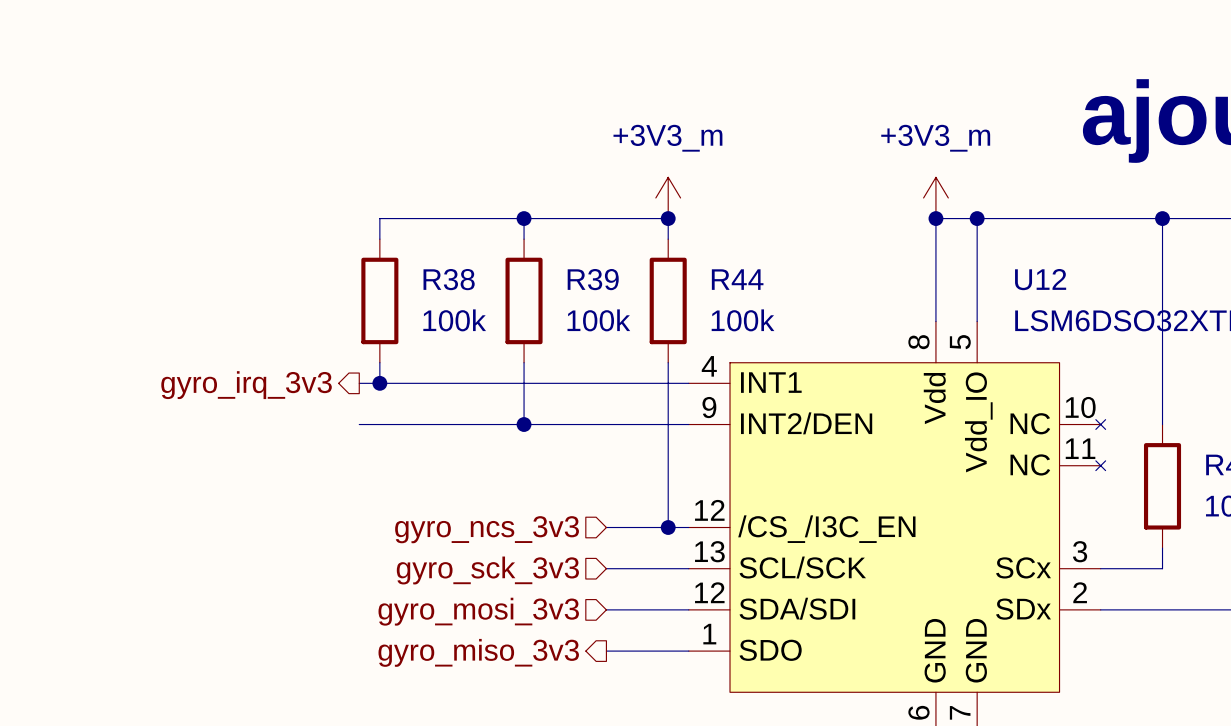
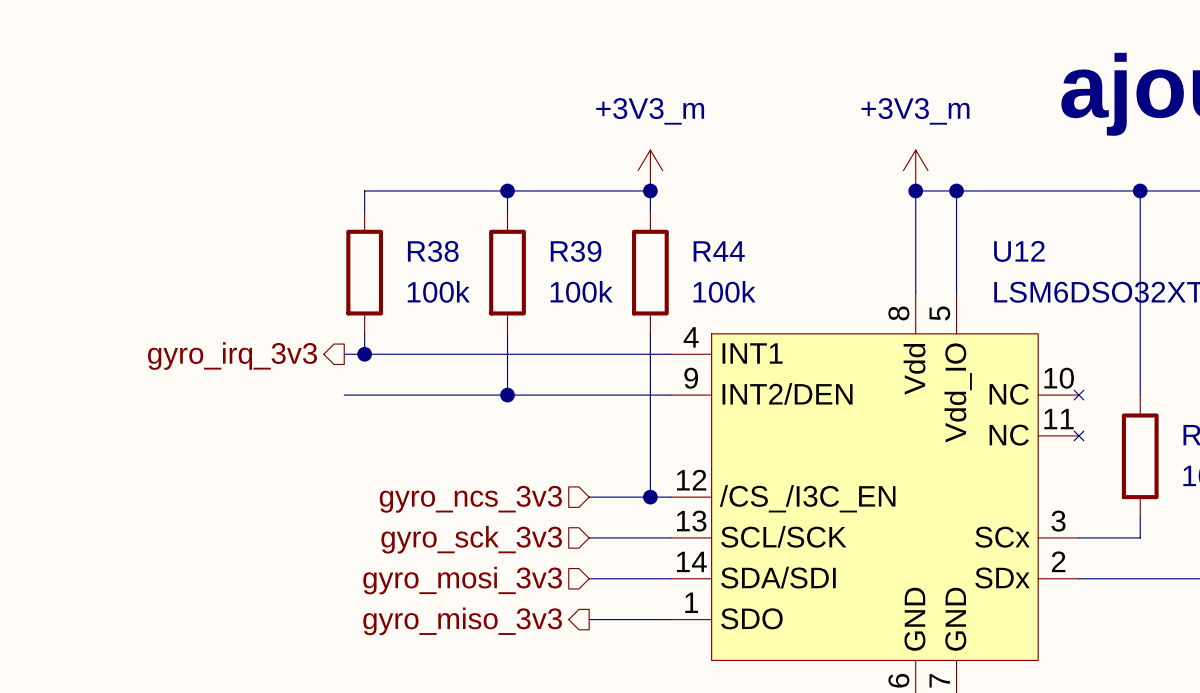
U12 pin number: 12 (709, 592) -> 14 (691, 561)

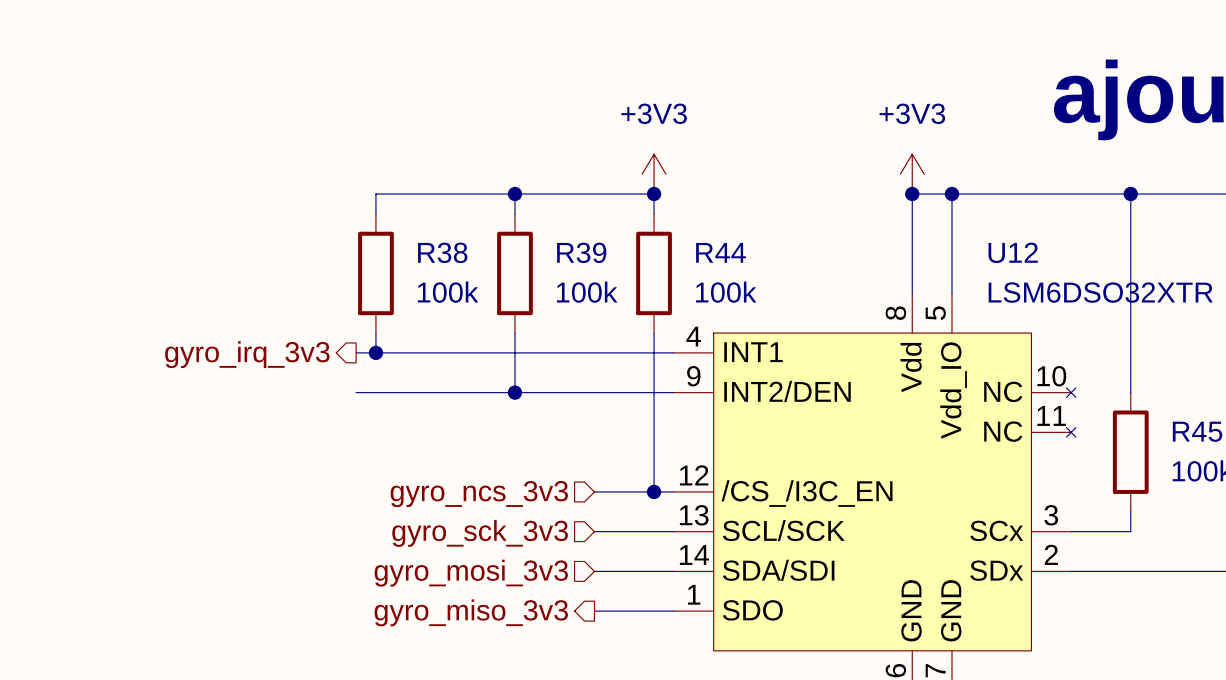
power symbol: +3V3_m (650, 170) -> +3V3 (654, 174)
power symbol: +3V3_m (915, 170) -> +3V3 (912, 174)

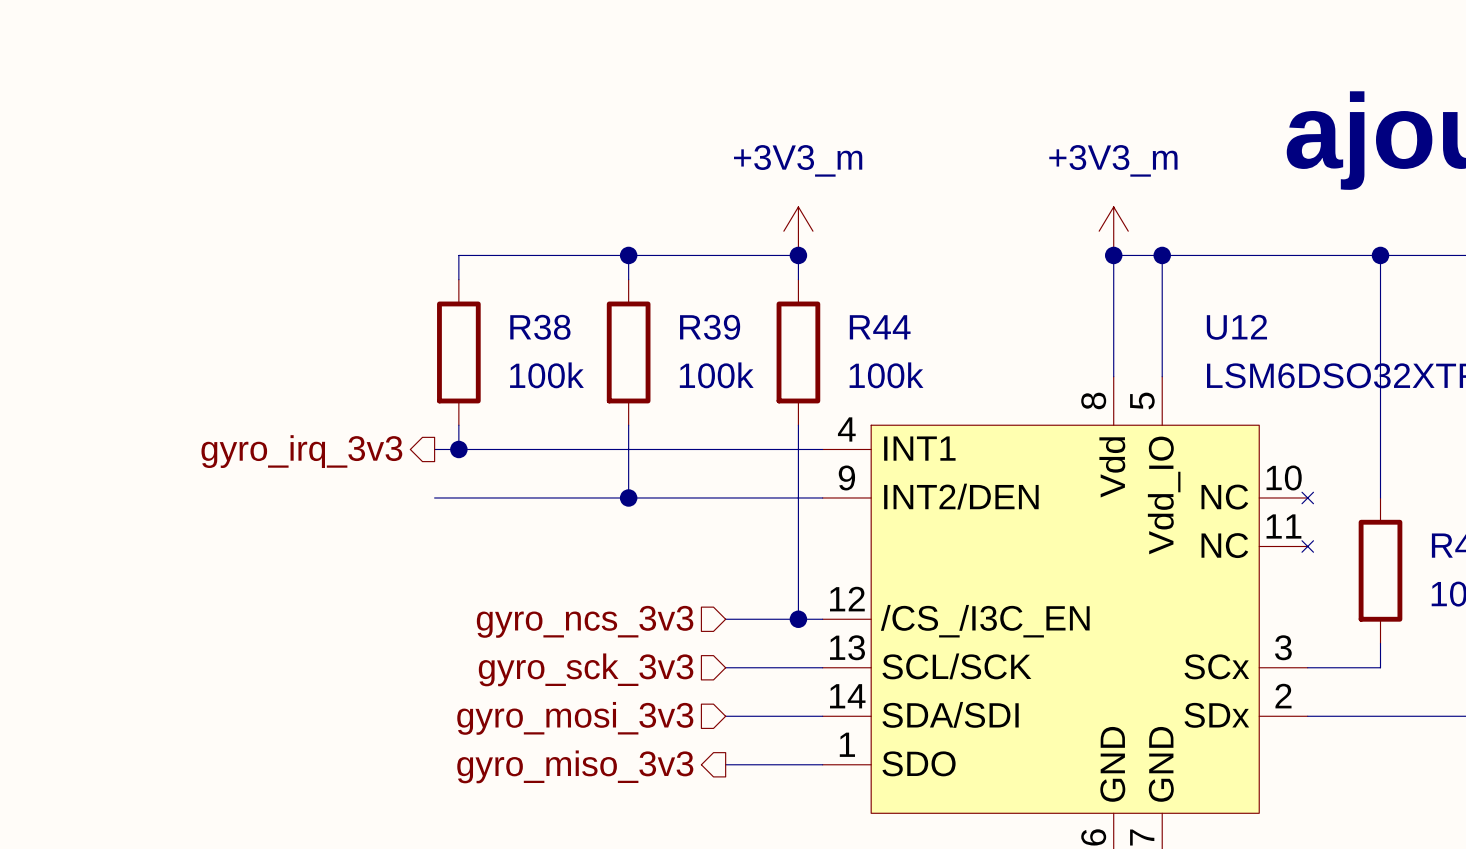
power symbol: +3V3 (654, 174) -> +3V3_m (798, 231)
power symbol: +3V3 (912, 174) -> +3V3_m (1113, 231)

